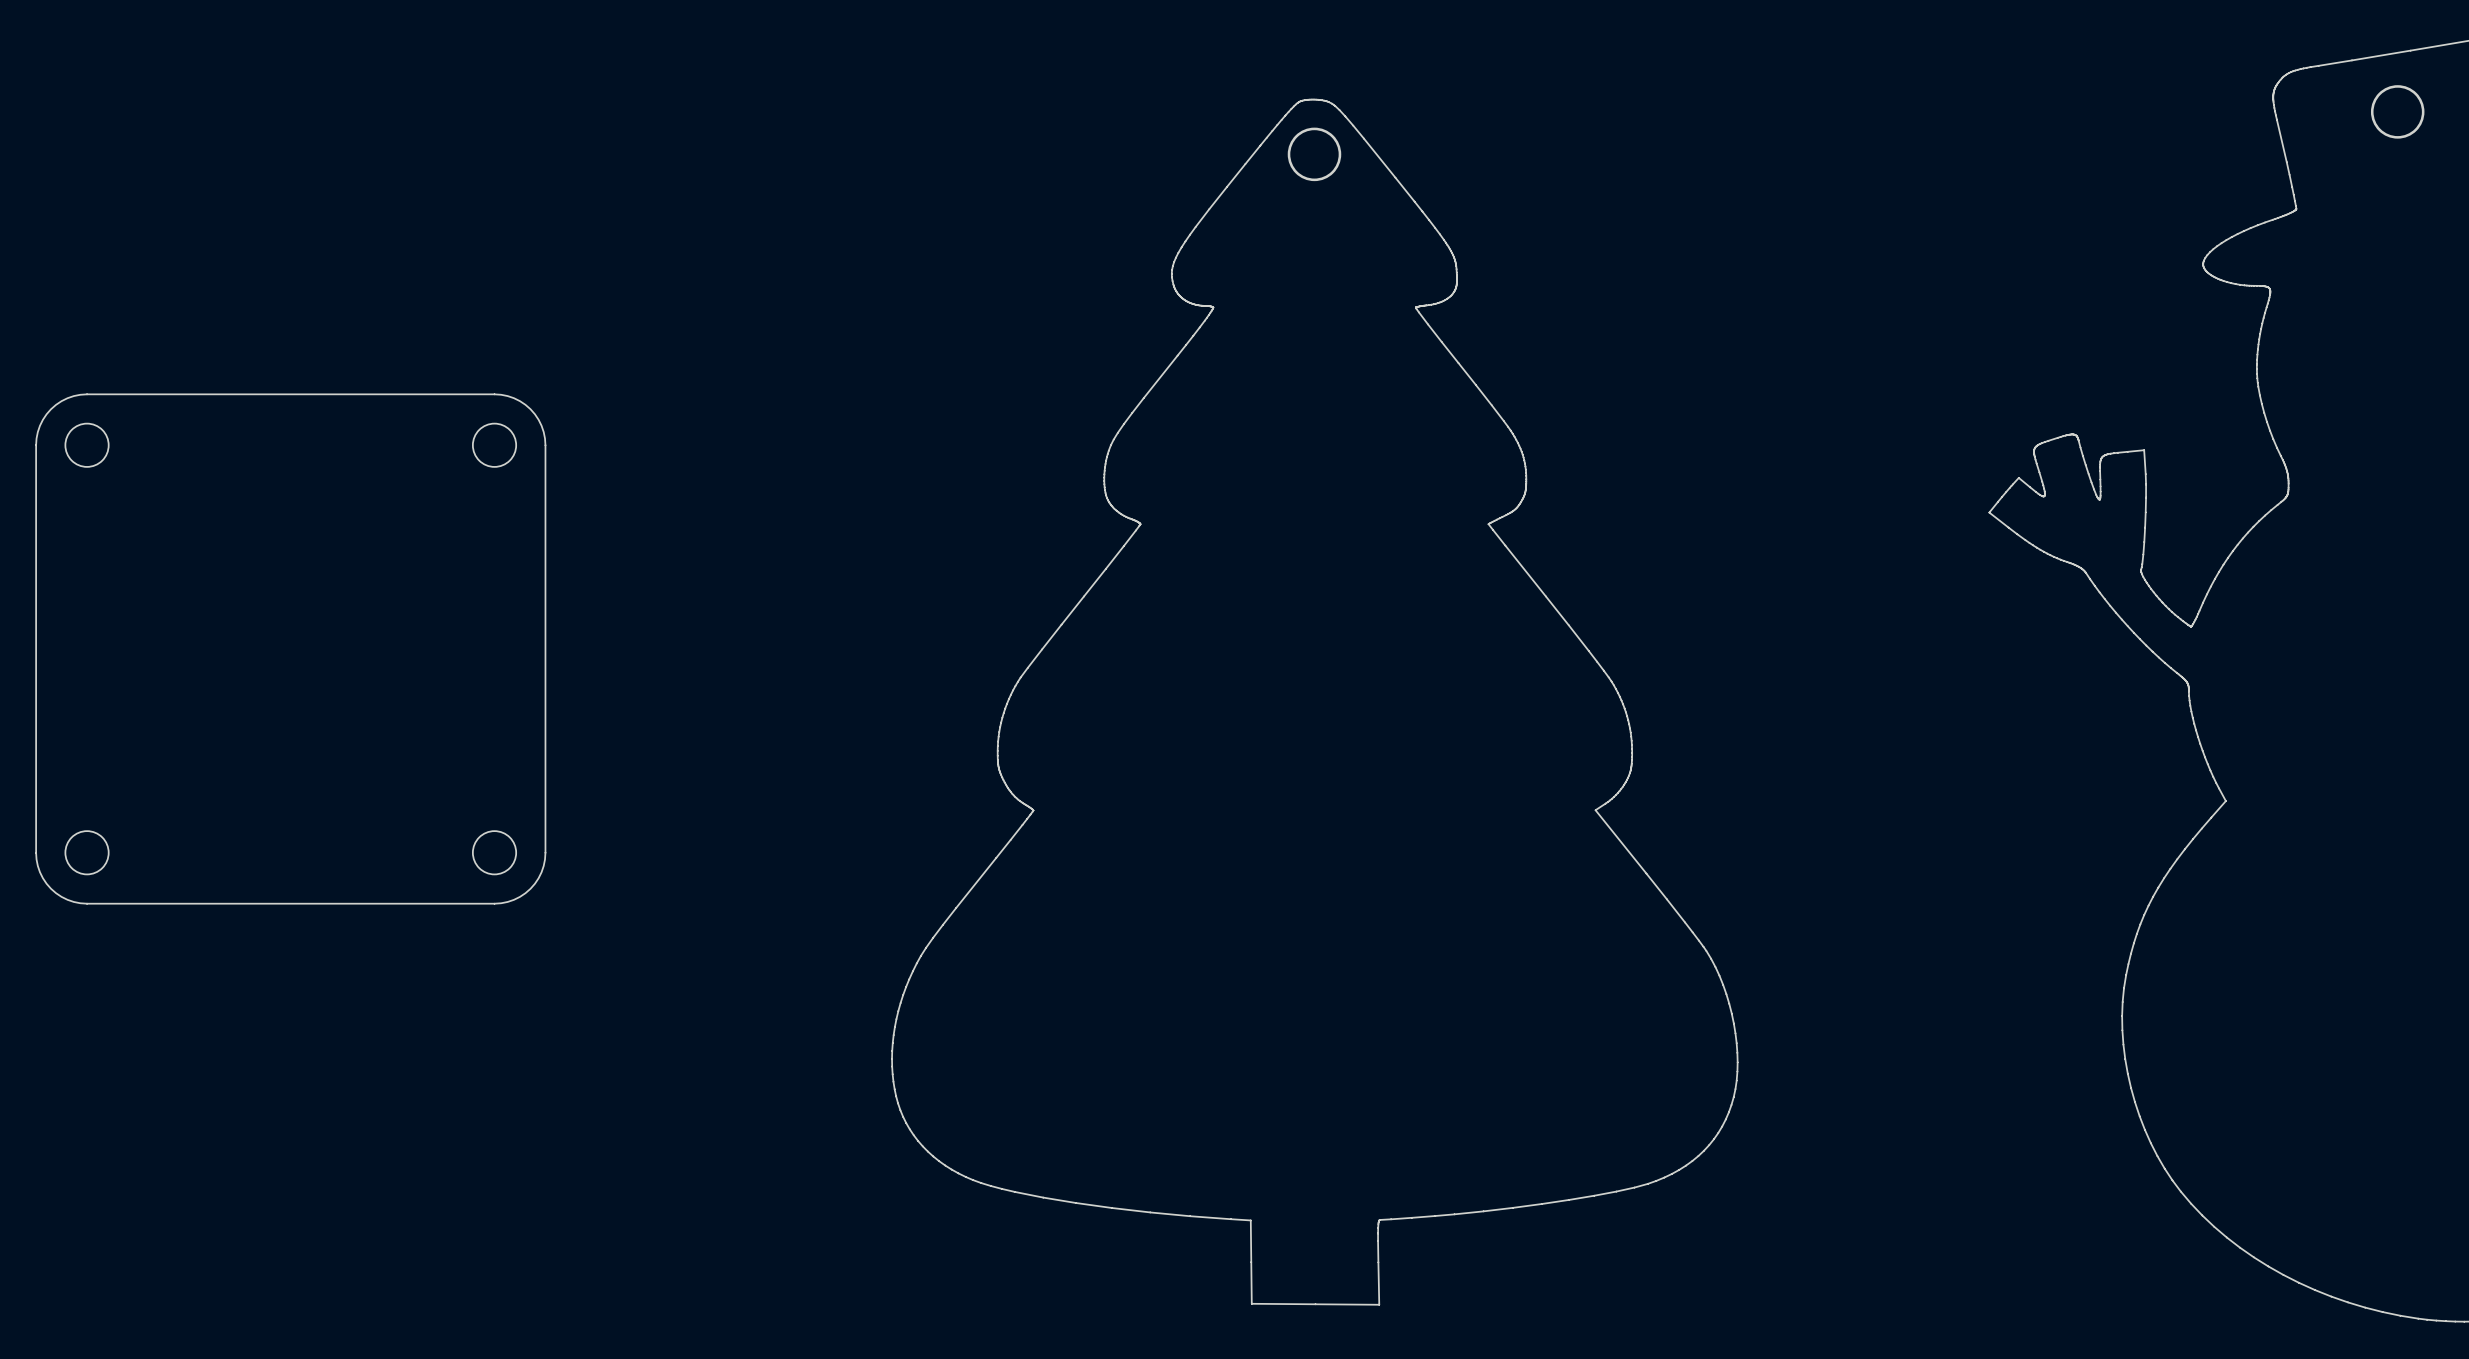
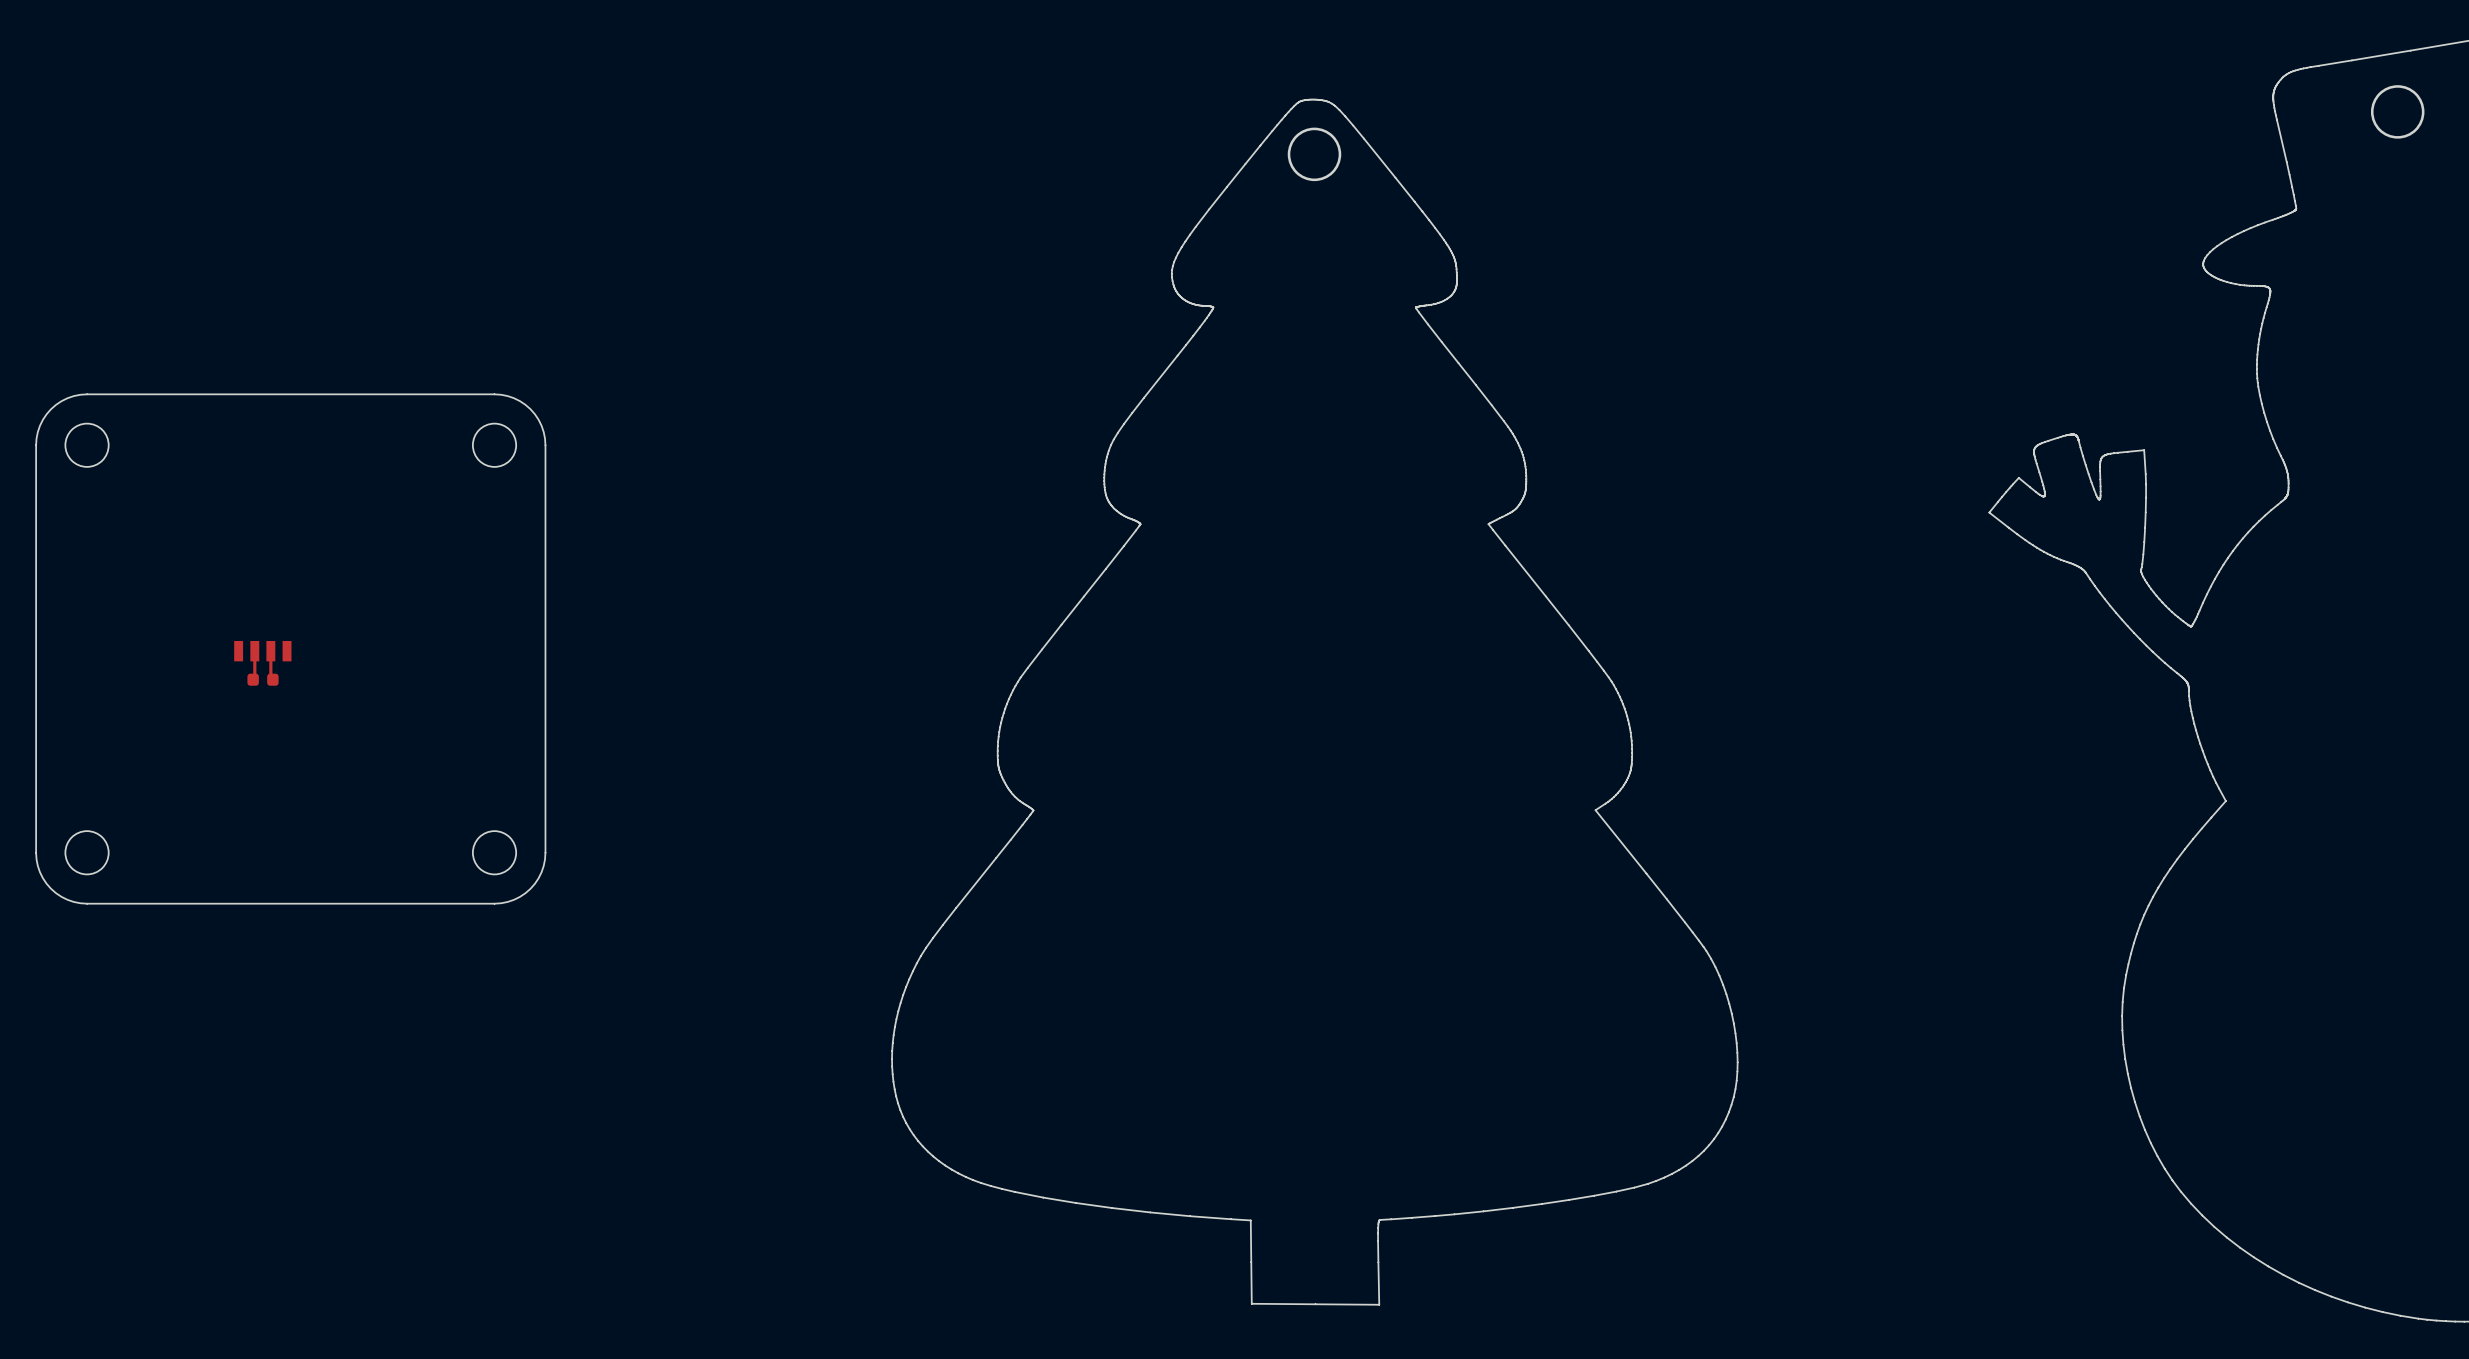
top track: none -> (254, 651) (254, 678) (253, 679)
part: none -> (262, 651)
top track: none -> (270, 651) (270, 677) (272, 679)
part: none -> (263, 679)

